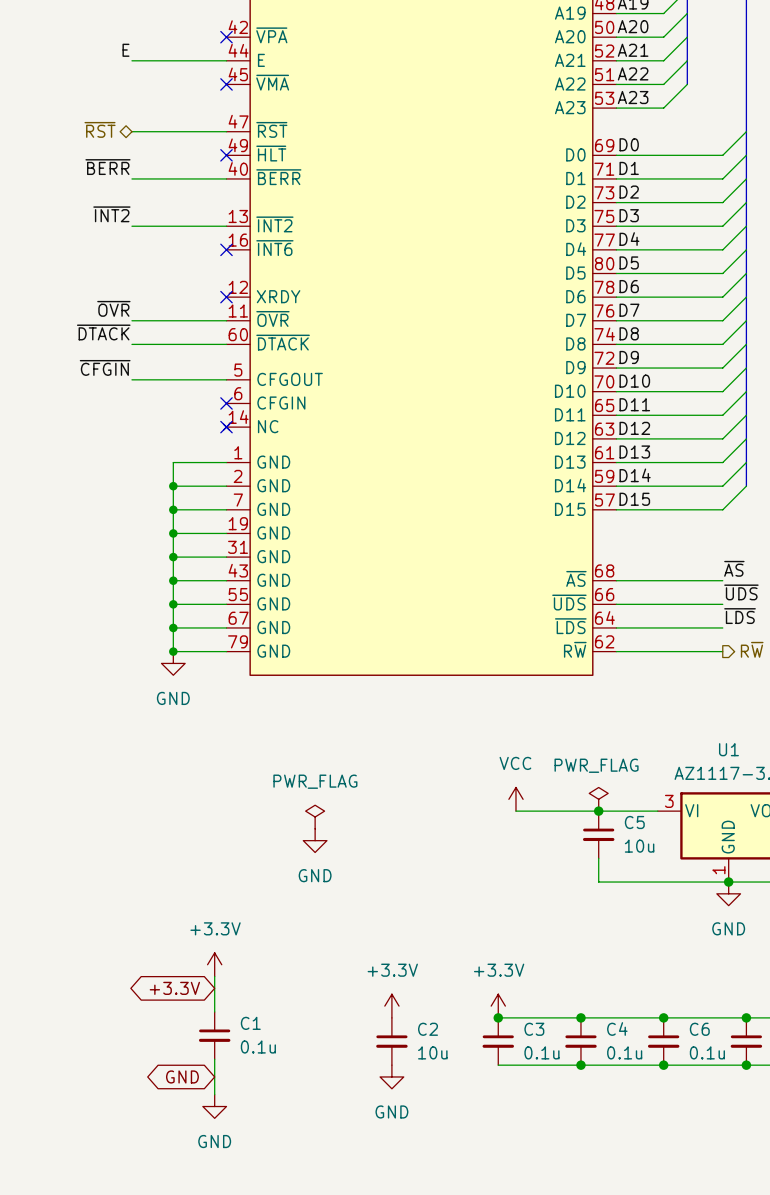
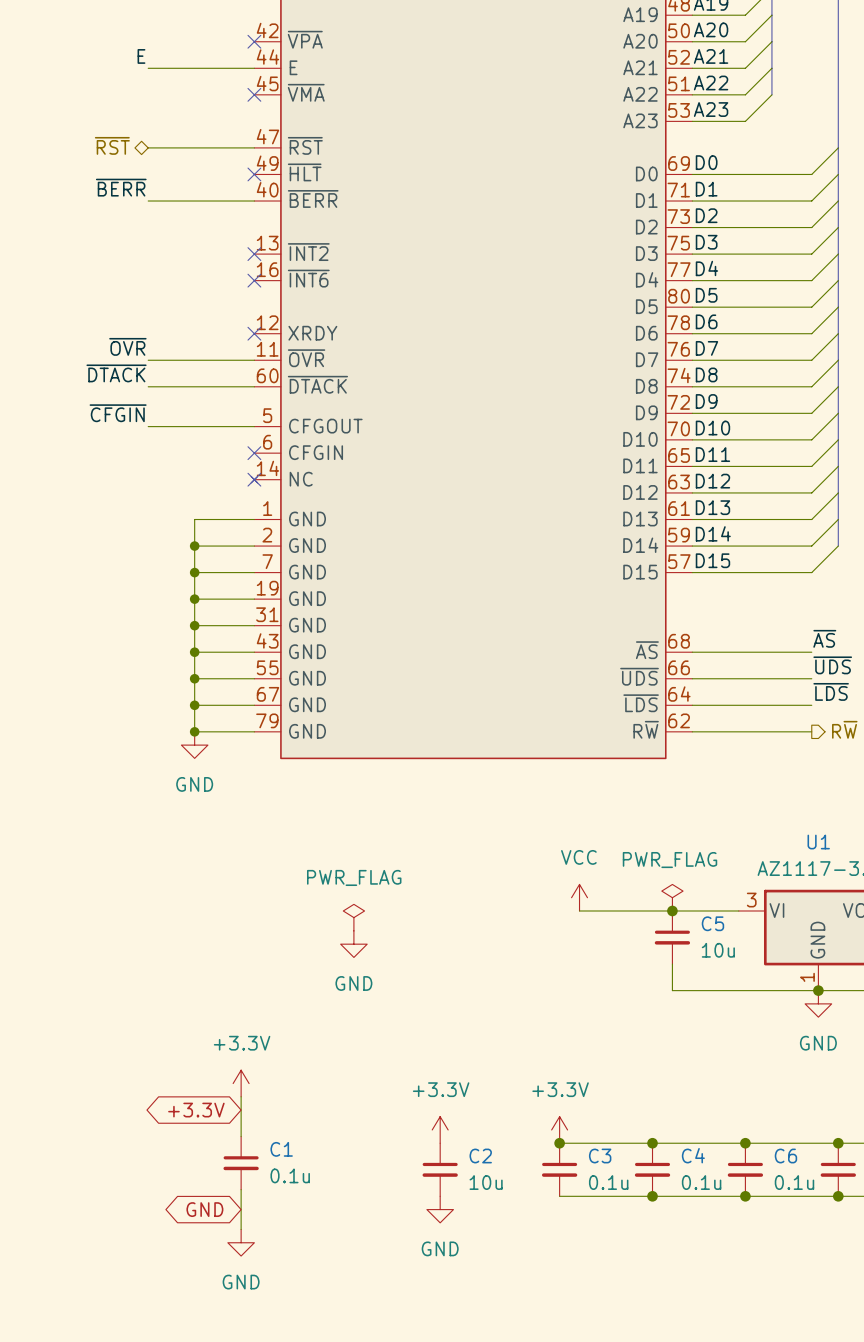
label: ~{INT2} (111, 214) -> none
wire: (131, 226) (226, 226) -> none
no-connect mark: none -> (254, 254)

